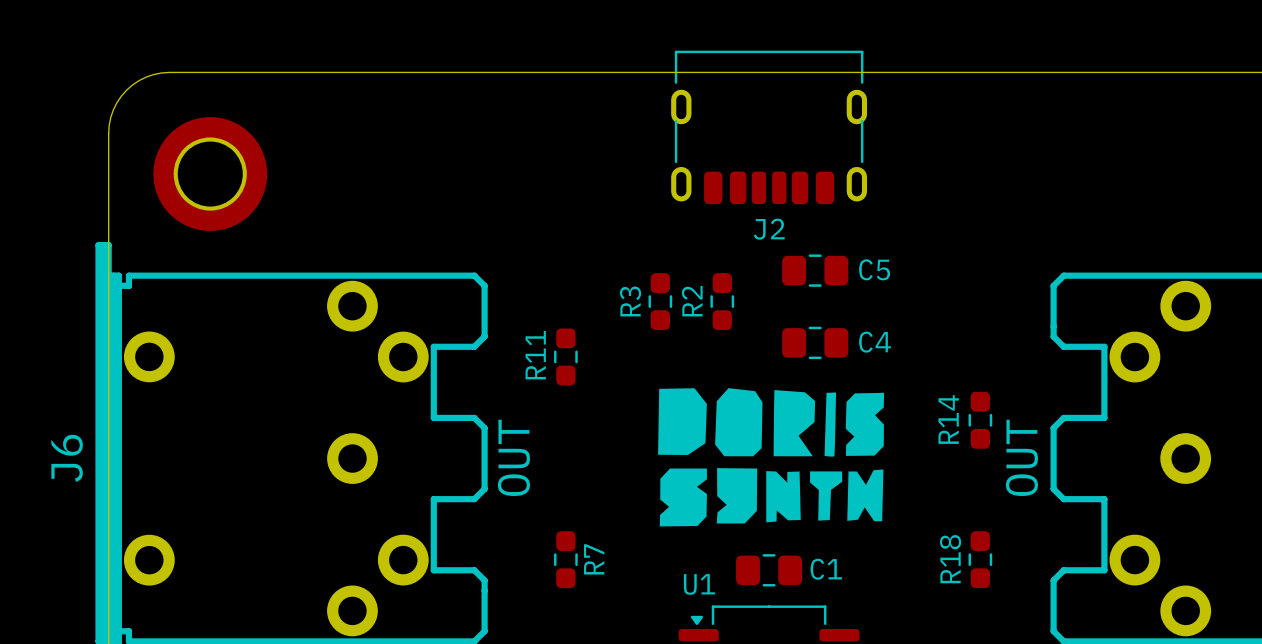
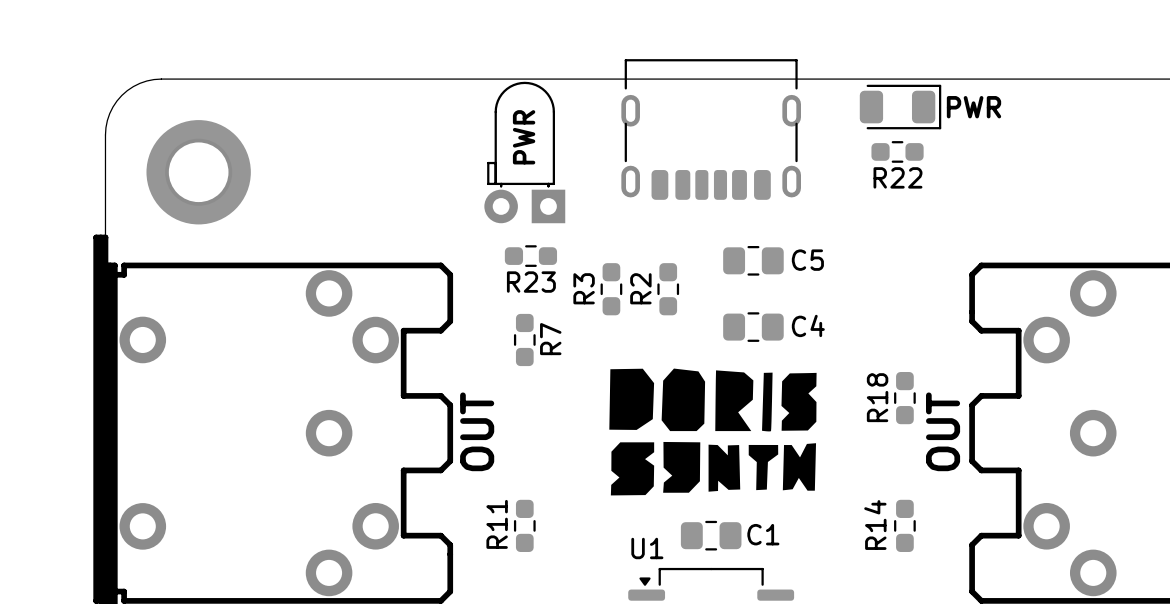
part: none -> (900, 107)
text: none -> PWR (974, 107)
text: none -> PWR (524, 137)
R22: none -> (897, 151)
part: none -> (524, 152)
J2 name: J2 (769, 229) -> none
R23: none -> (530, 256)
R11 name: R11 (535, 355) -> R7 (550, 339)
R14 name: R14 (948, 419) -> R18 (877, 397)
J6 name: J6 (67, 458) -> none
R7 name: R7 (594, 559) -> R11 (497, 524)
R18 name: R18 (950, 559) -> R14 (875, 525)

